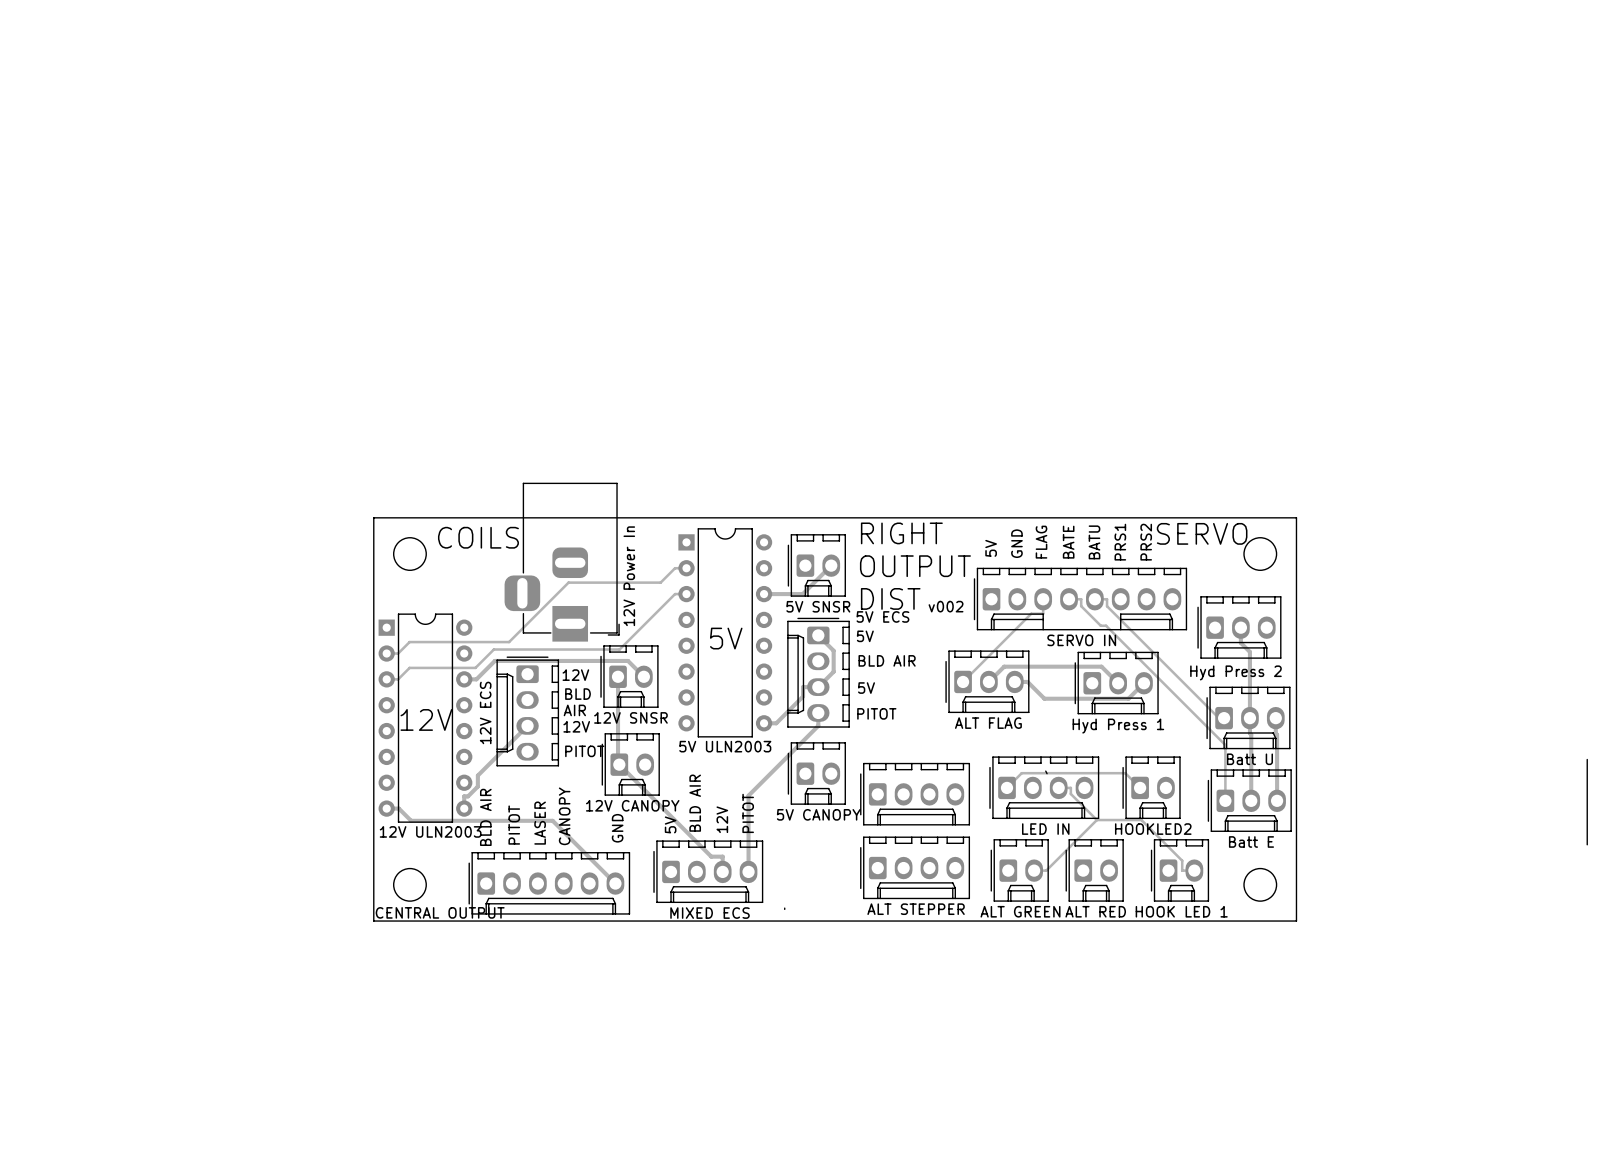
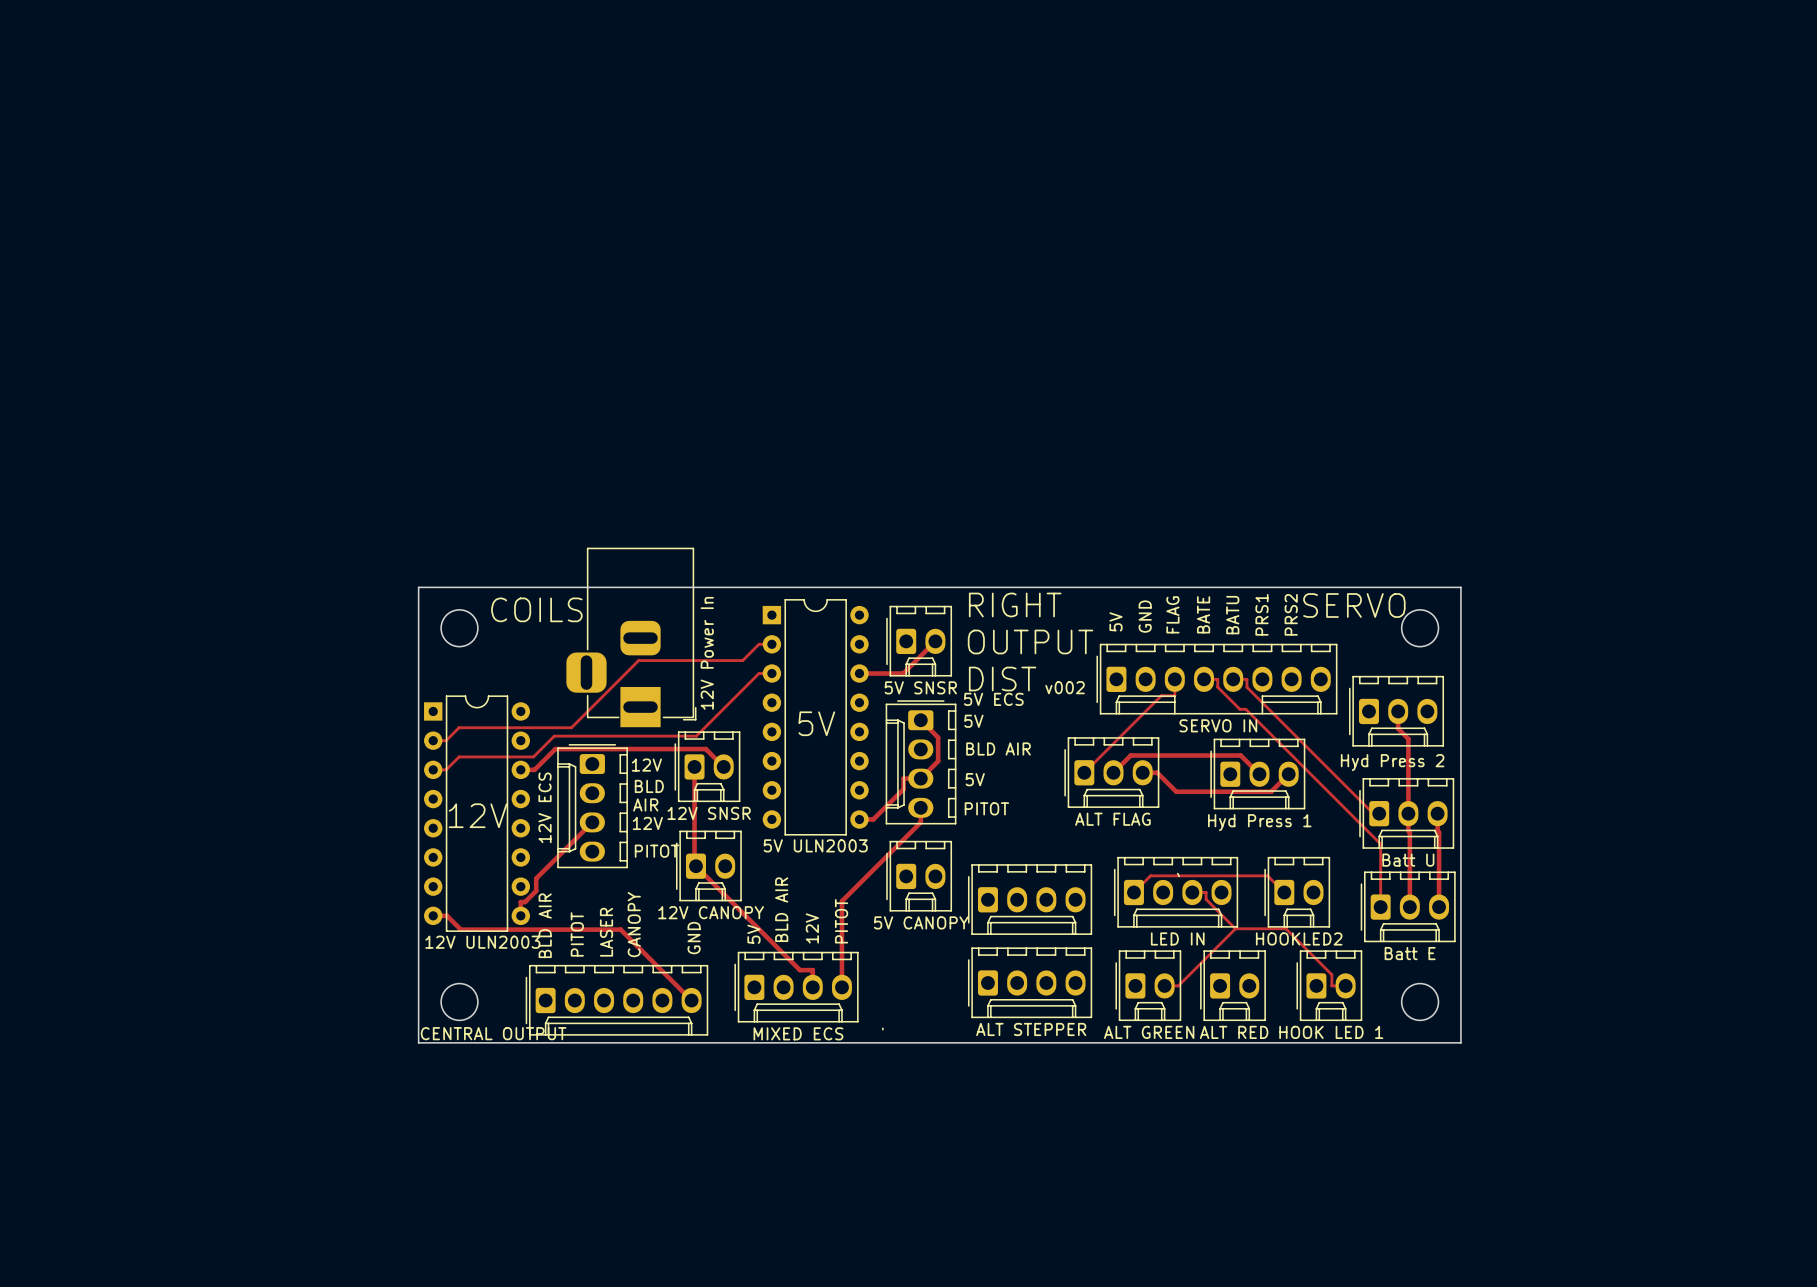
line: (1587, 759) (1587, 844) -> none

